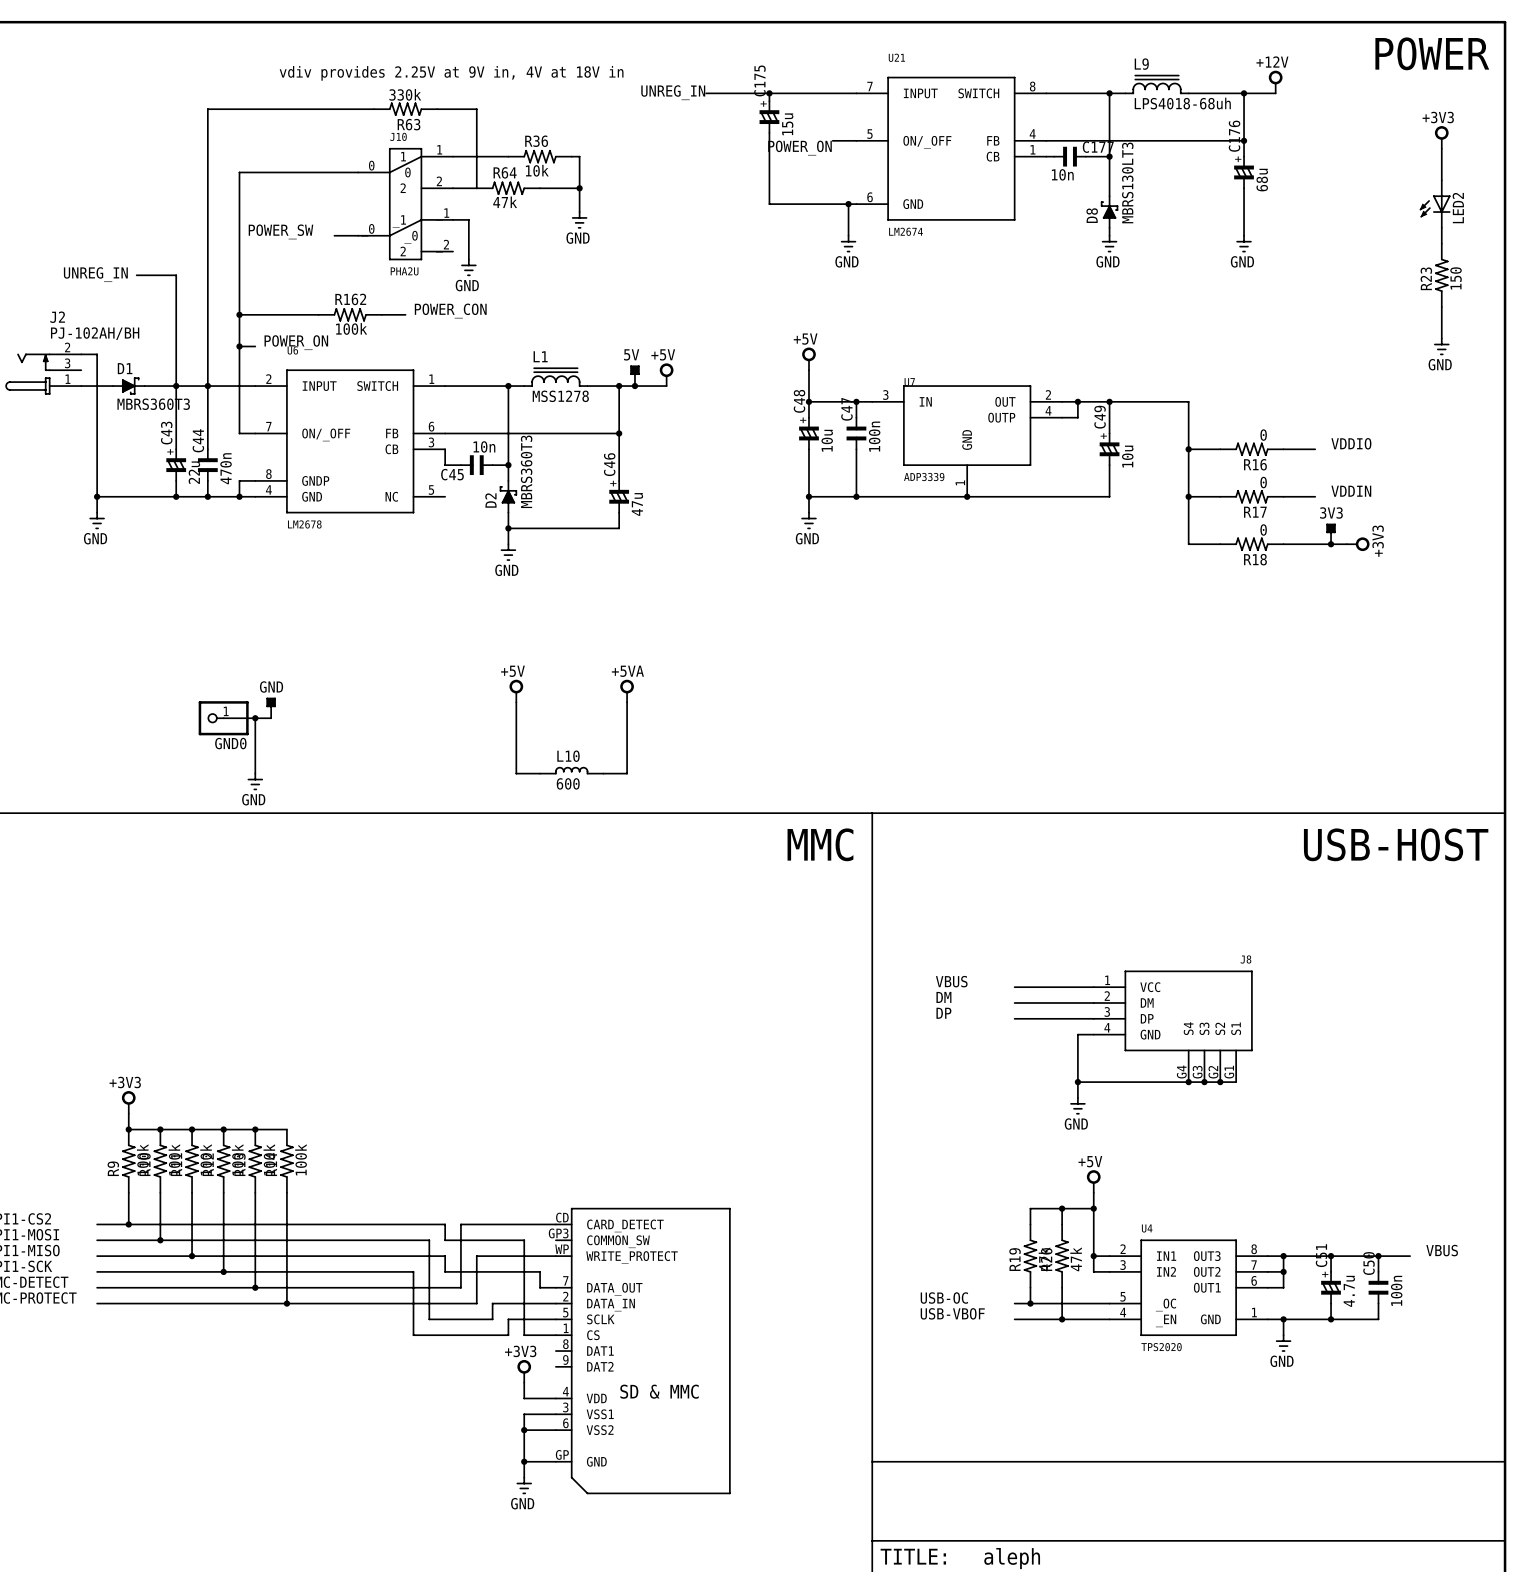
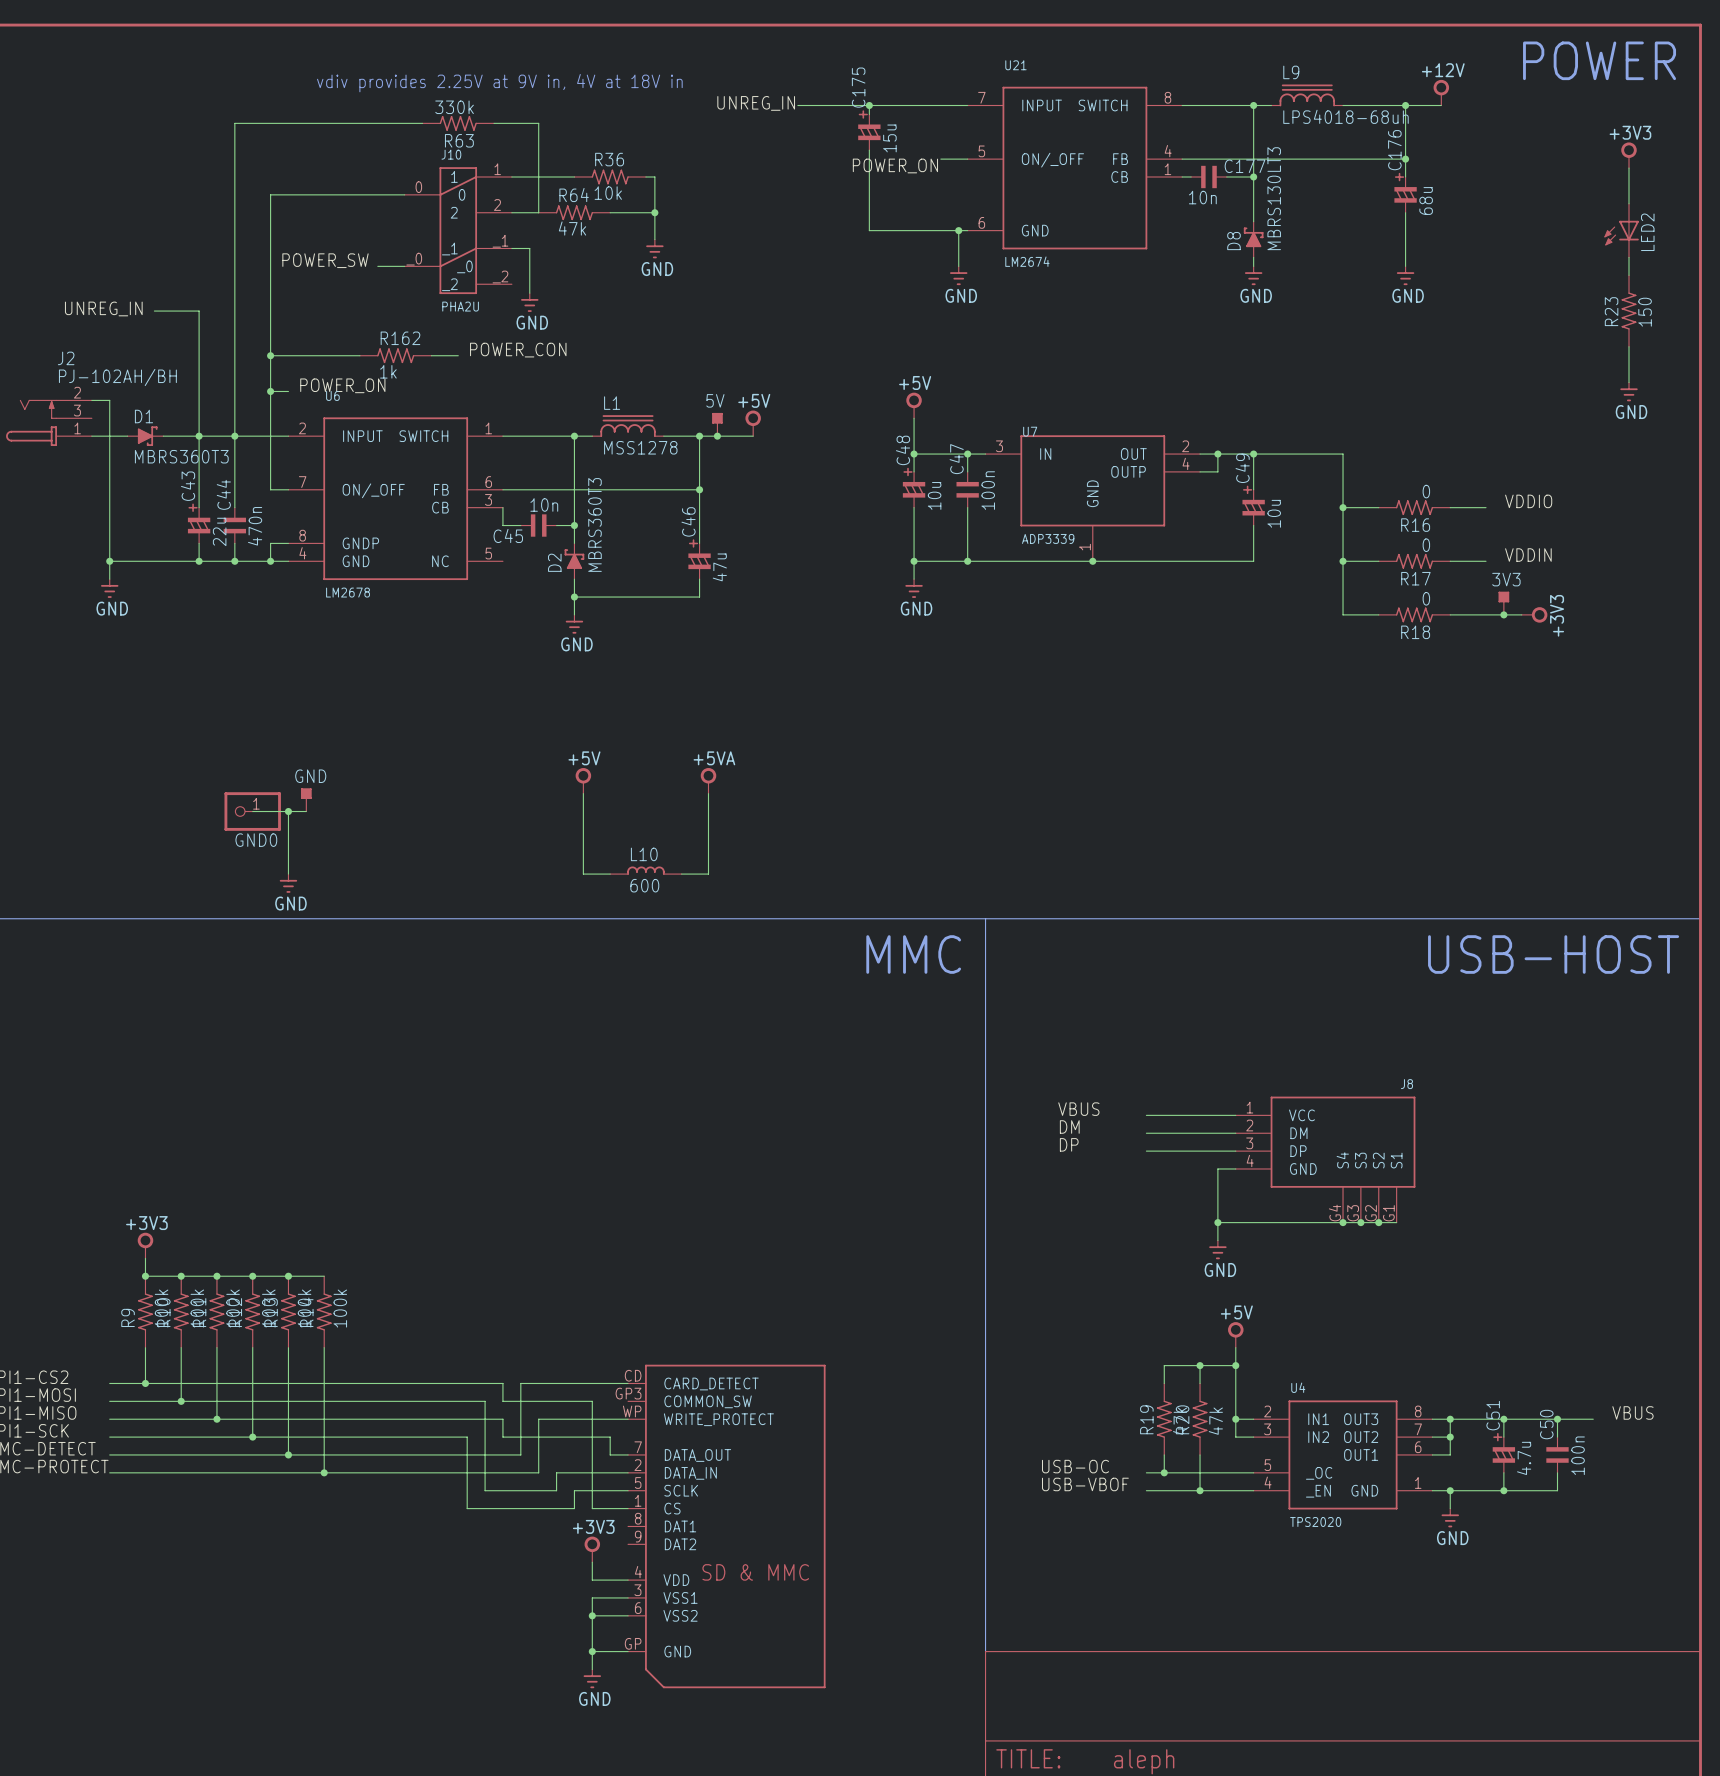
R162 value: 100k (351, 328) -> 1k (388, 371)

